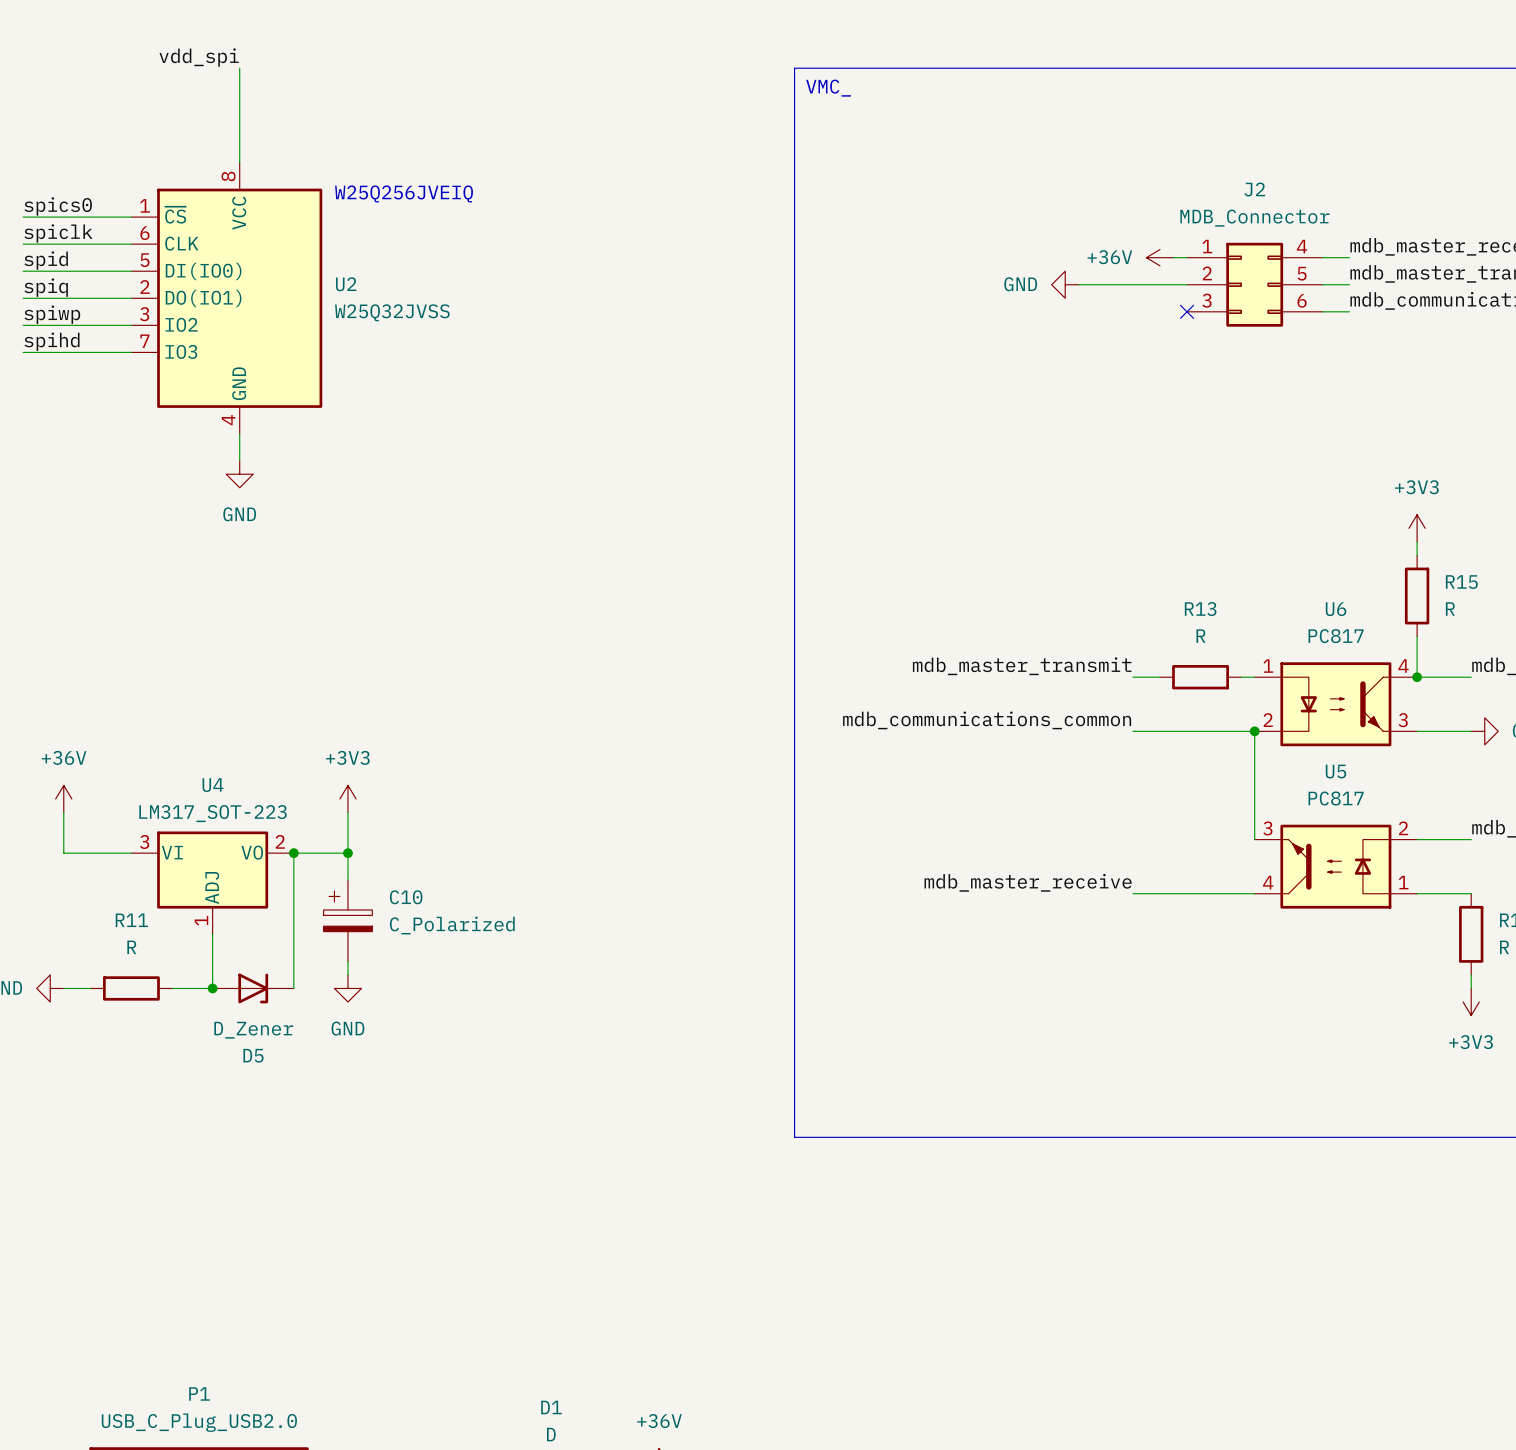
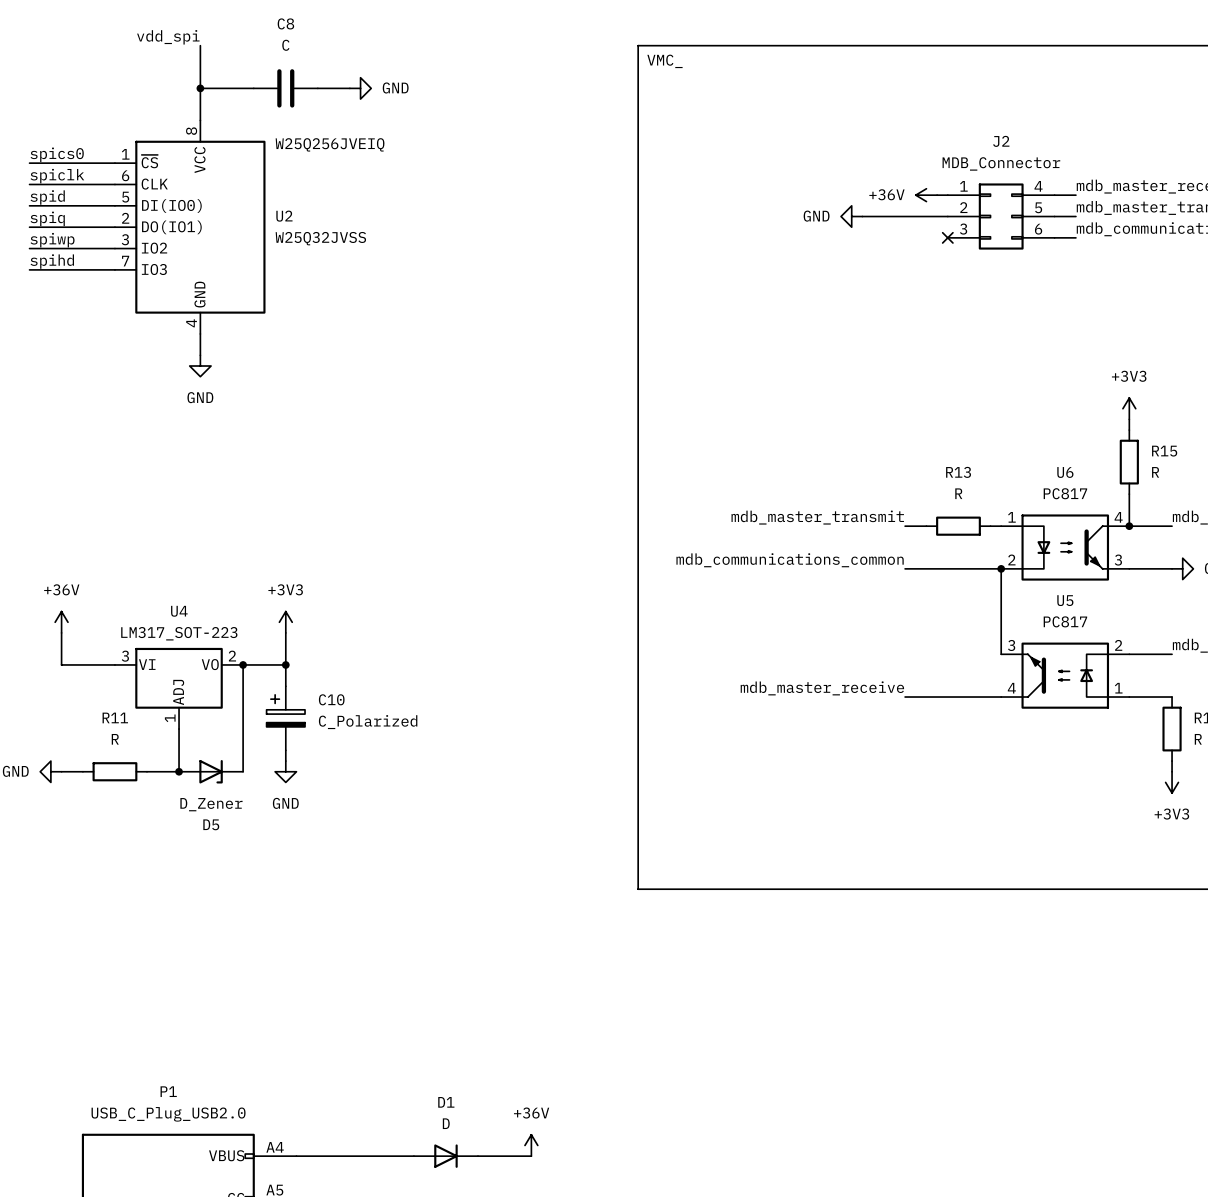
wire: none -> (200, 88) (253, 88)
junction: none -> (200, 88)
C8: none -> C (285, 88)
wire: none -> (317, 88) (349, 88)
power symbol: none -> GND (360, 88)

